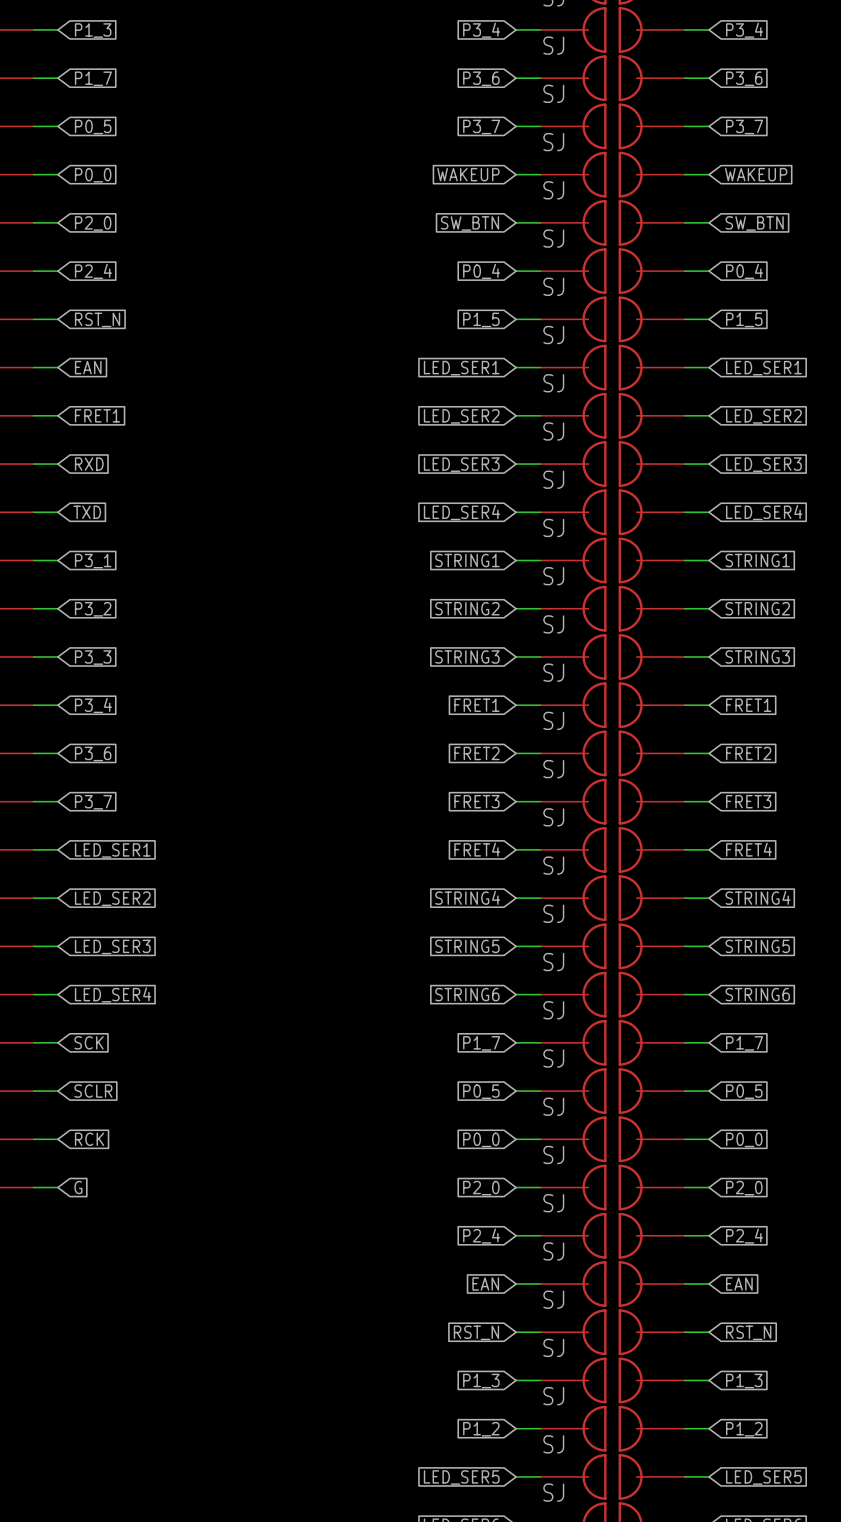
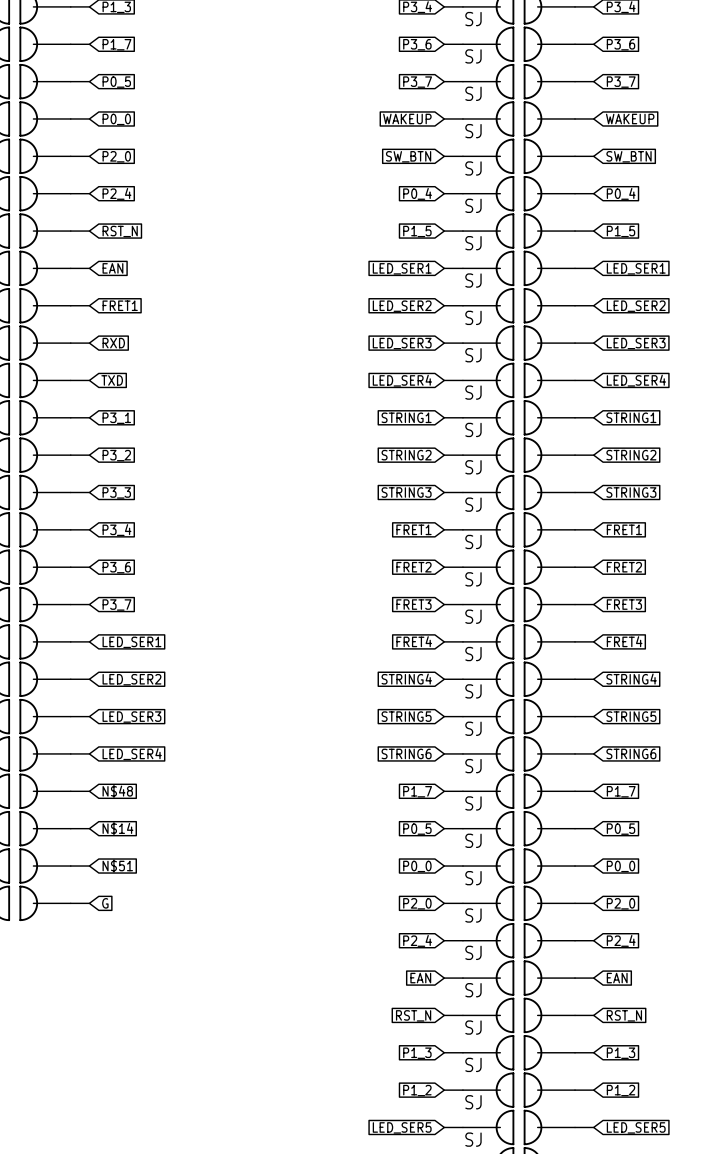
global label: SCK (89, 1042) -> N$48 (117, 791)
global label: SCLR (93, 1091) -> N$14 (117, 828)
global label: RCK (89, 1139) -> N$51 (117, 866)

